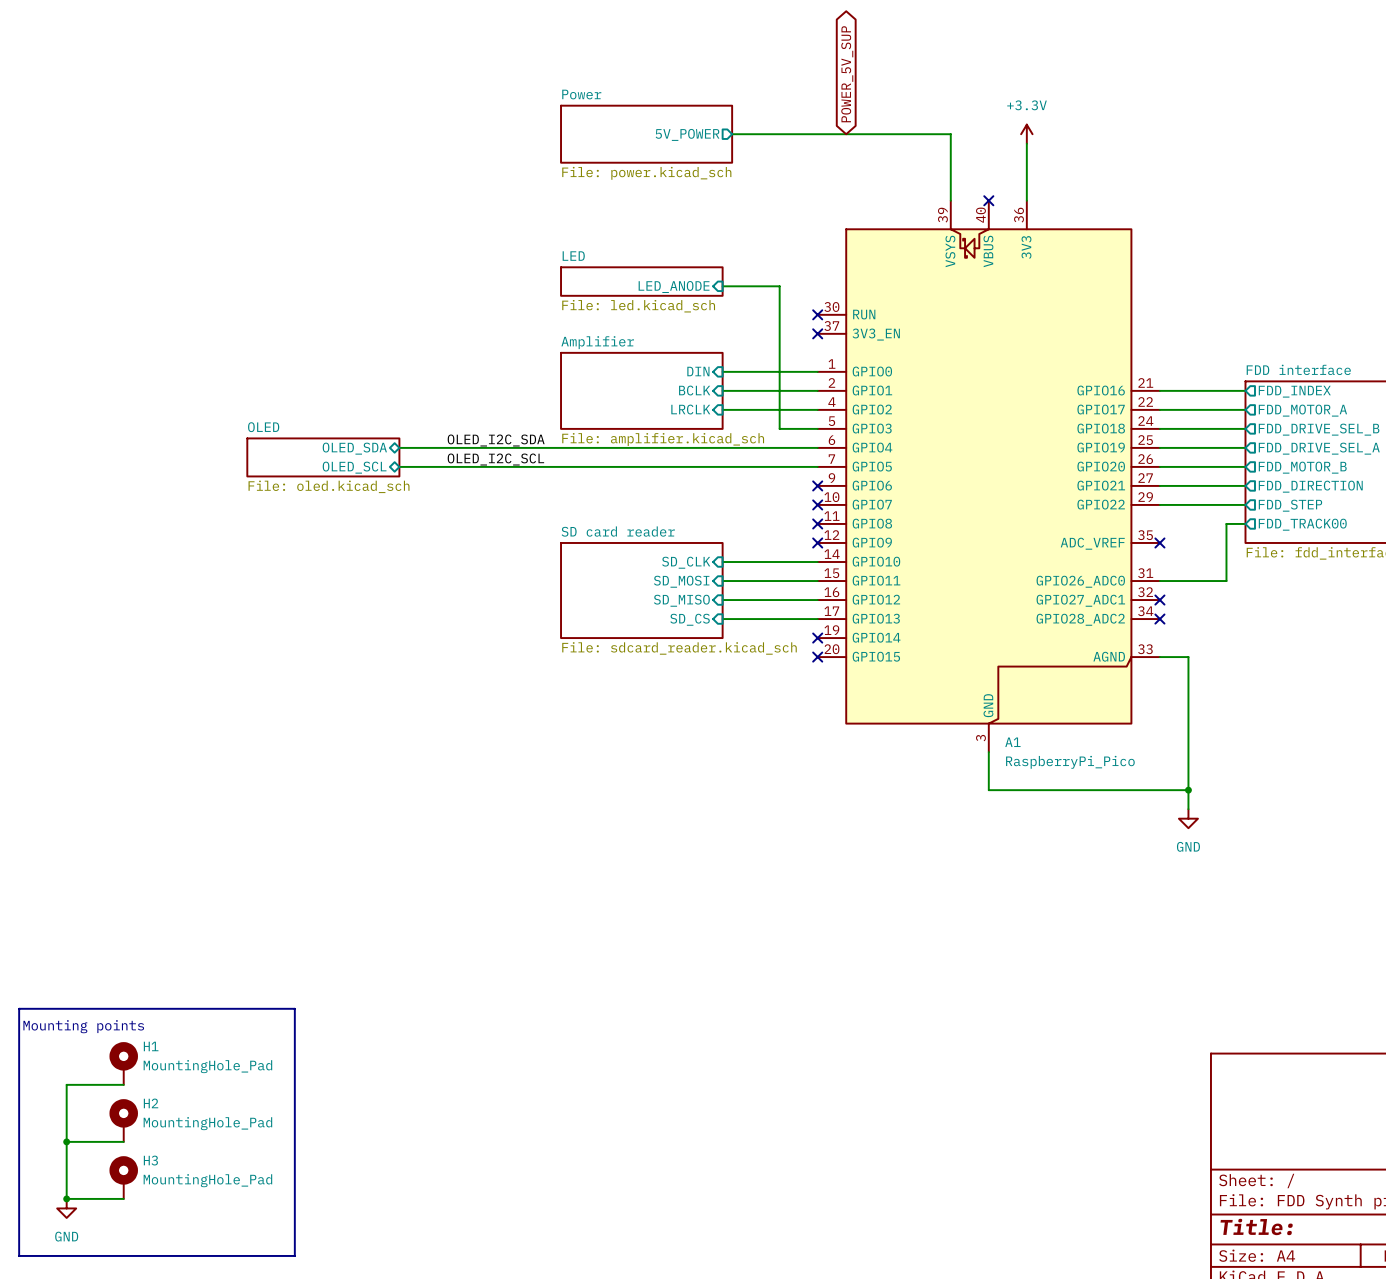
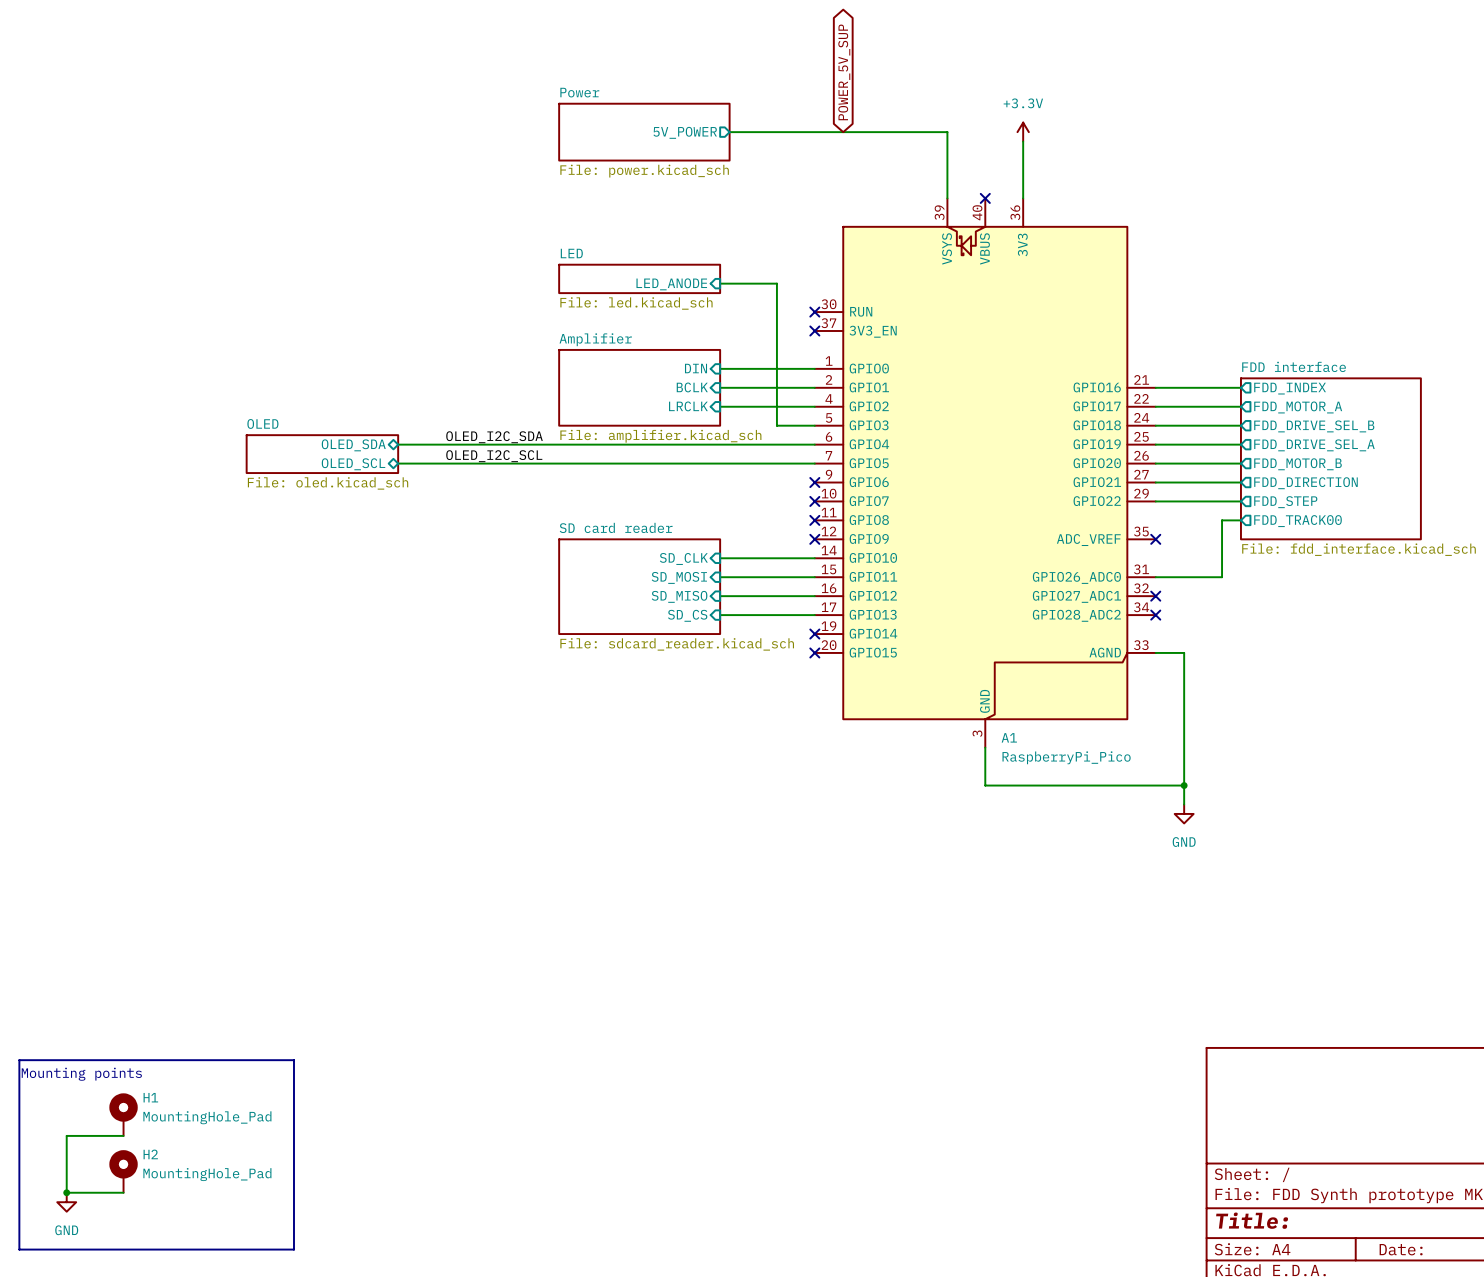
text position: Mounting points (83, 1026) -> Mounting points (81, 1074)
H1: MountingHole_Pad (123, 1063) -> none
line: (19, 1065) (19, 1008) (294, 1008) (294, 1065) -> (19, 1060) (293, 1060)
wire: (123, 1084) (66, 1084) (66, 1141) -> none
H2 name: H2 (151, 1103) -> H1 (150, 1097)
junction: (66, 1141) -> none
H3 name: H3 (150, 1160) -> H2 (150, 1154)

